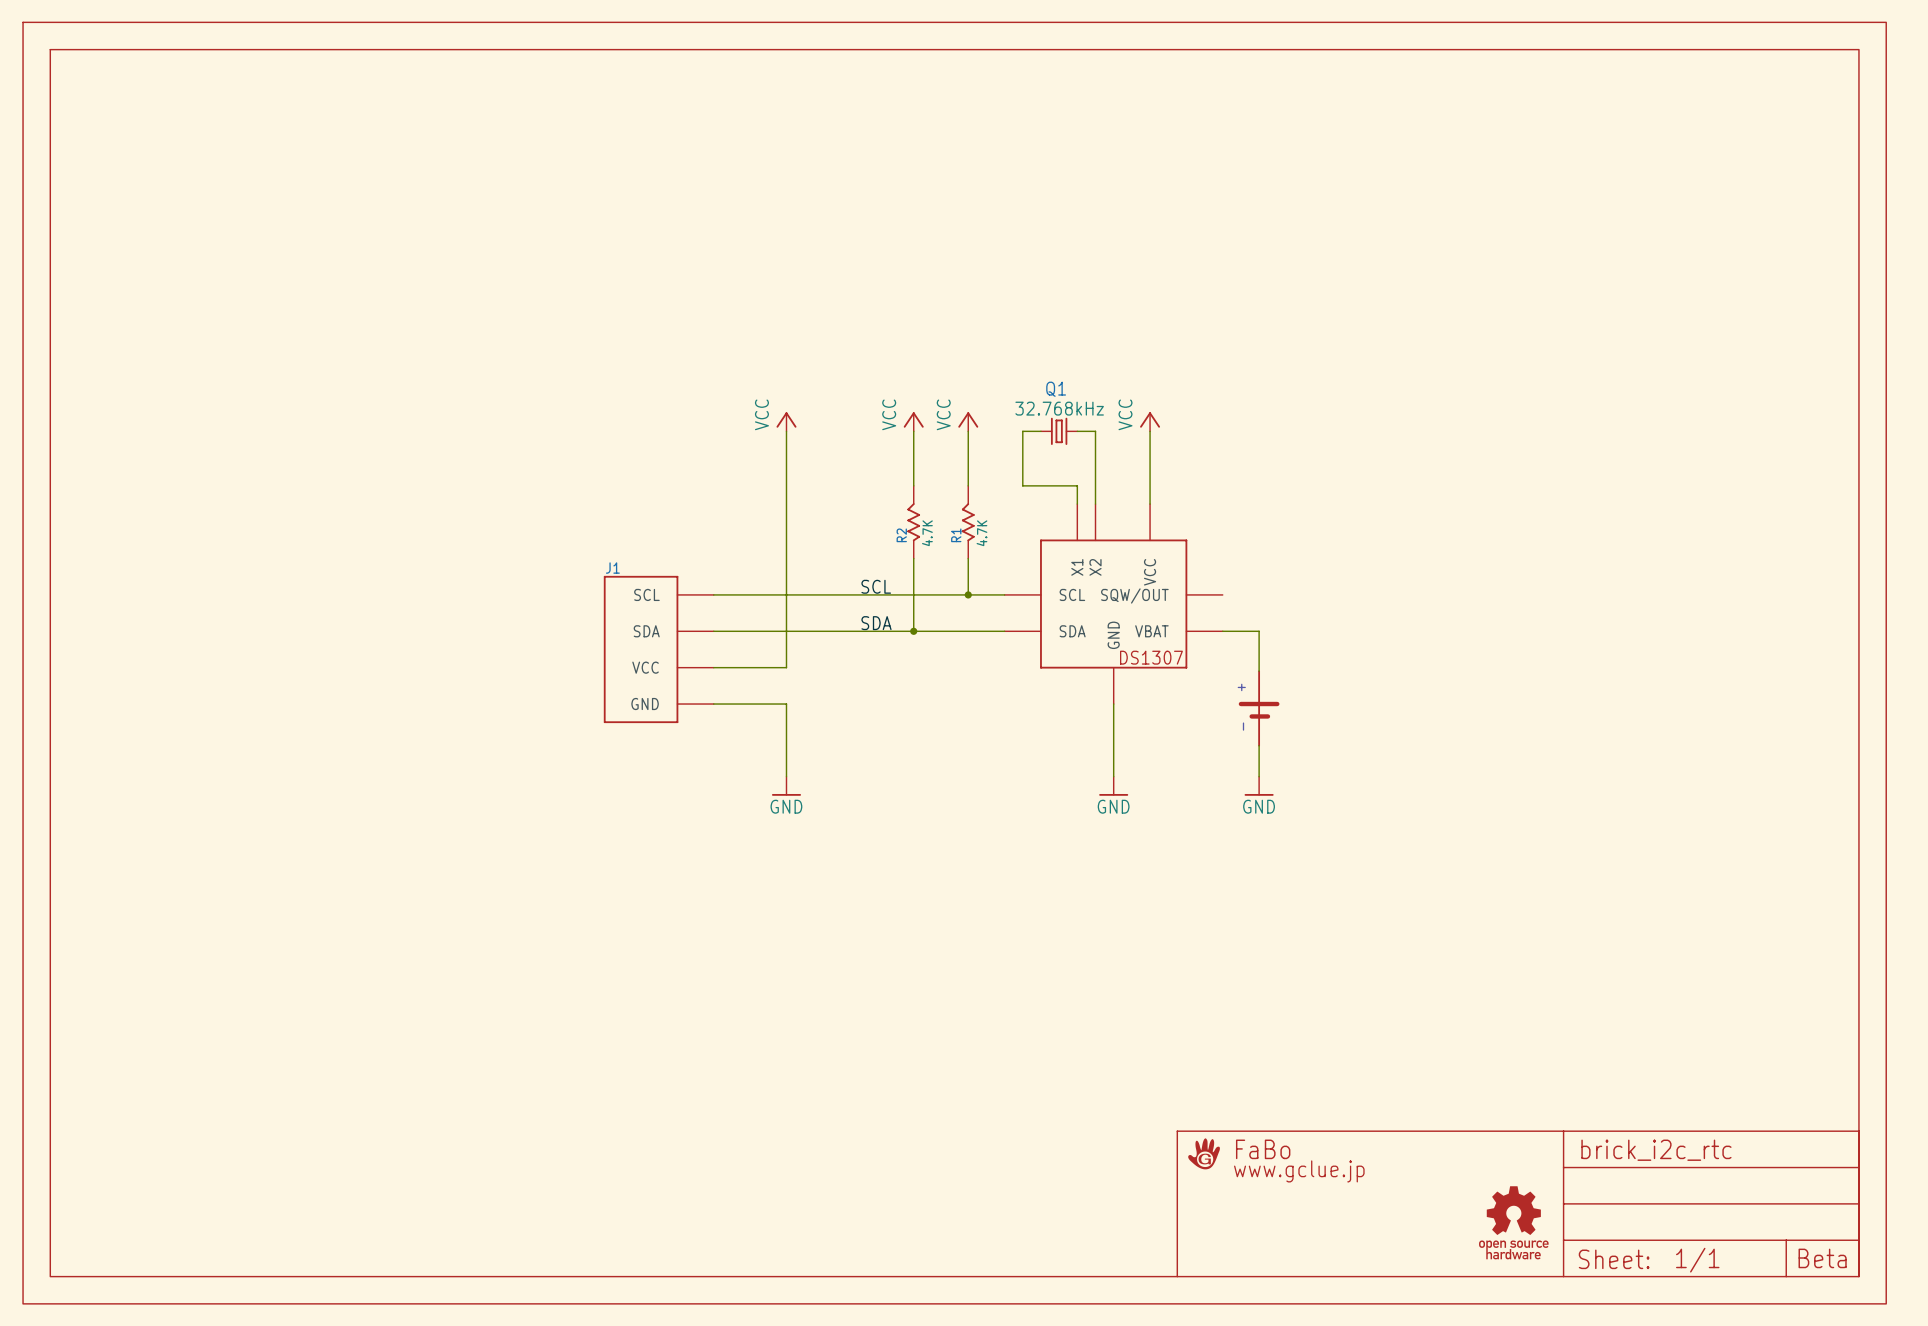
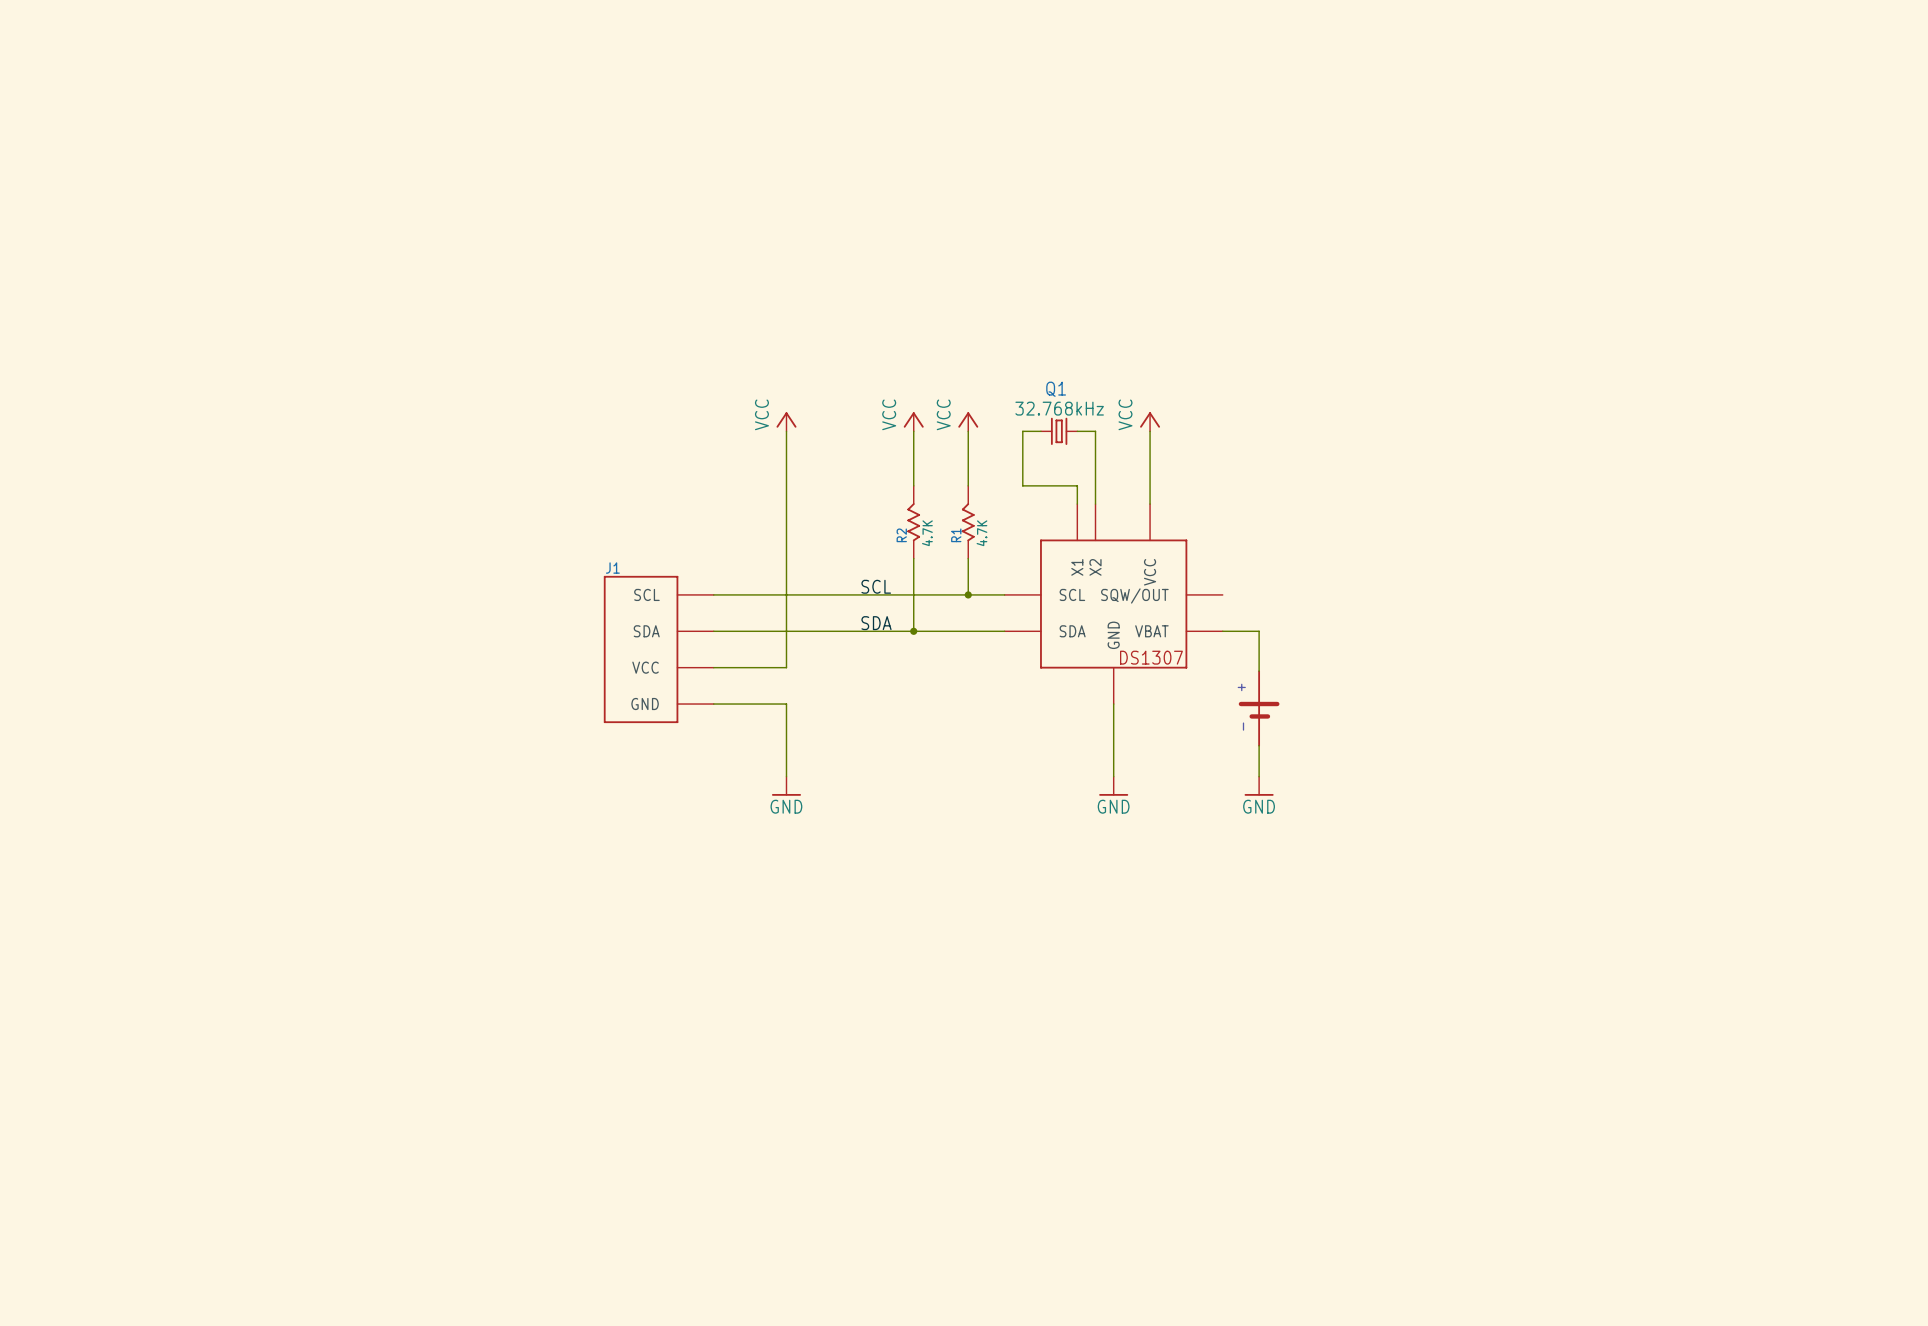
part: (954, 663) -> none
part: (1513, 1222) -> none
text: Beta (1822, 1258) -> none

